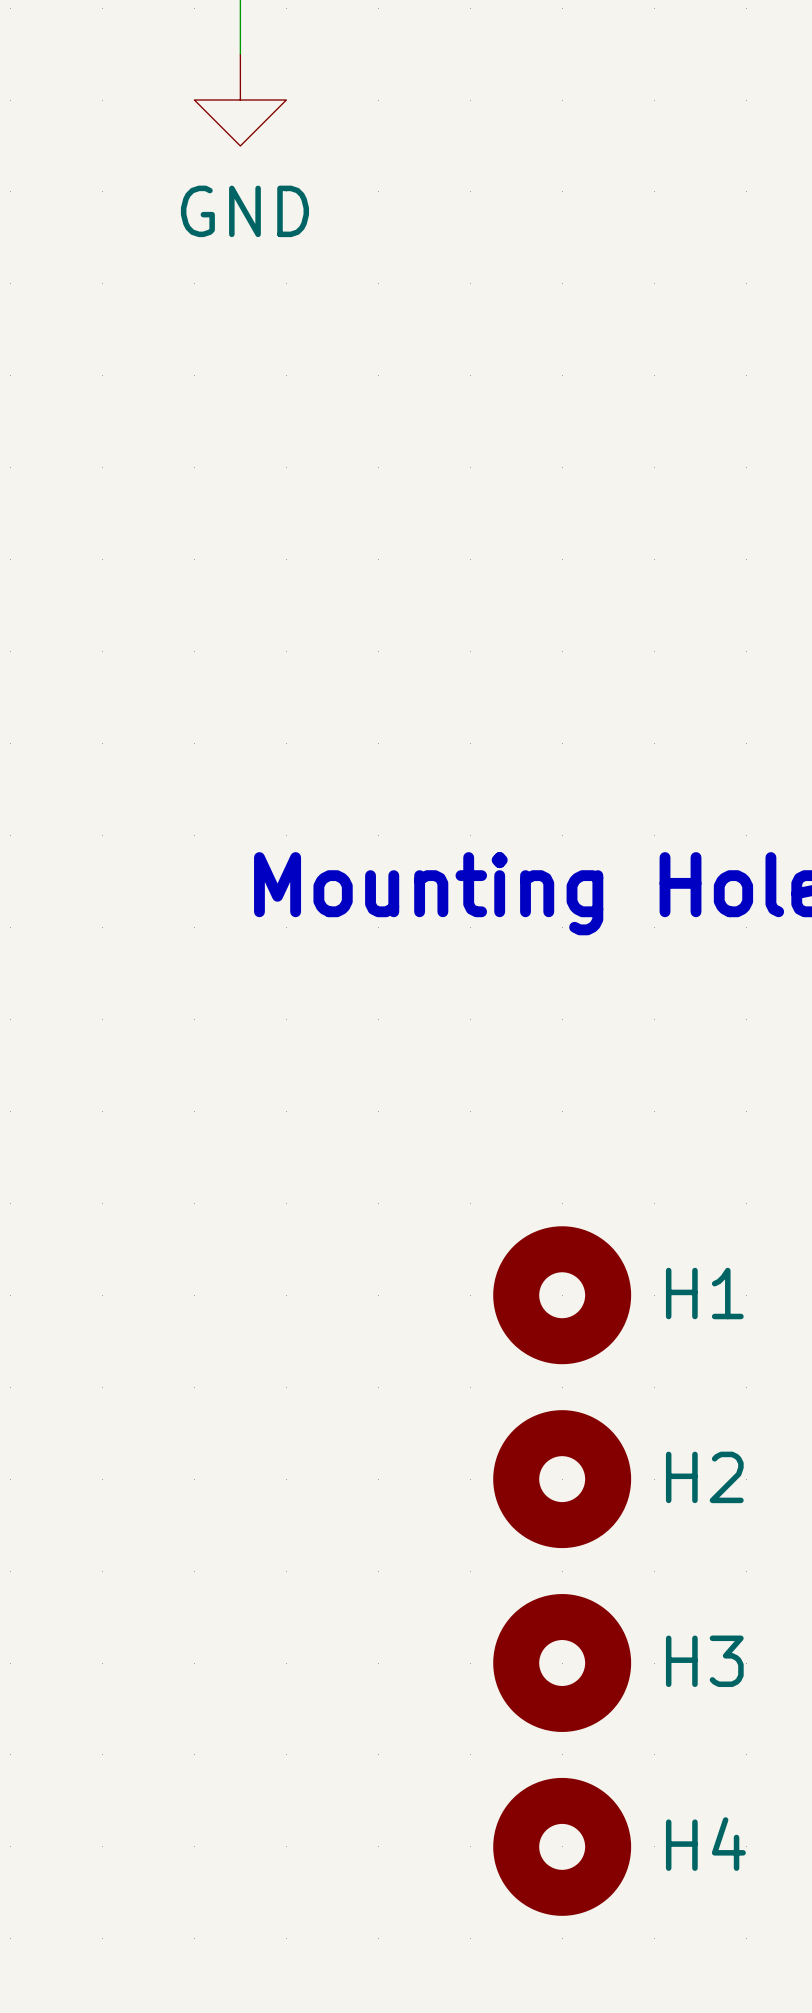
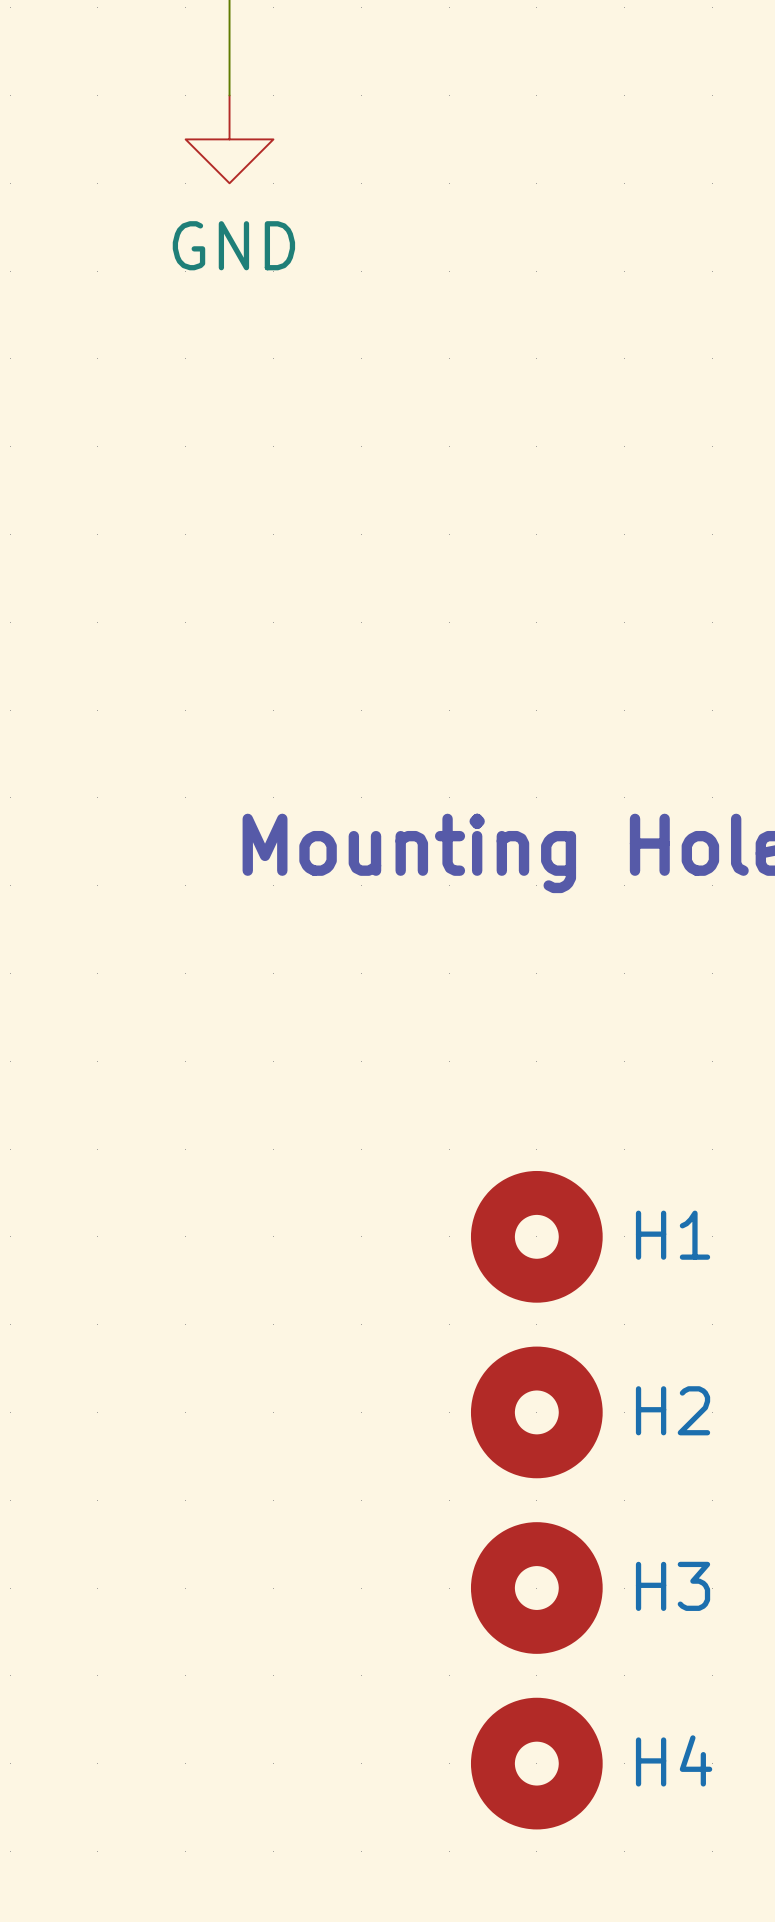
power symbol position: GND (240, 100) -> GND (229, 139)

